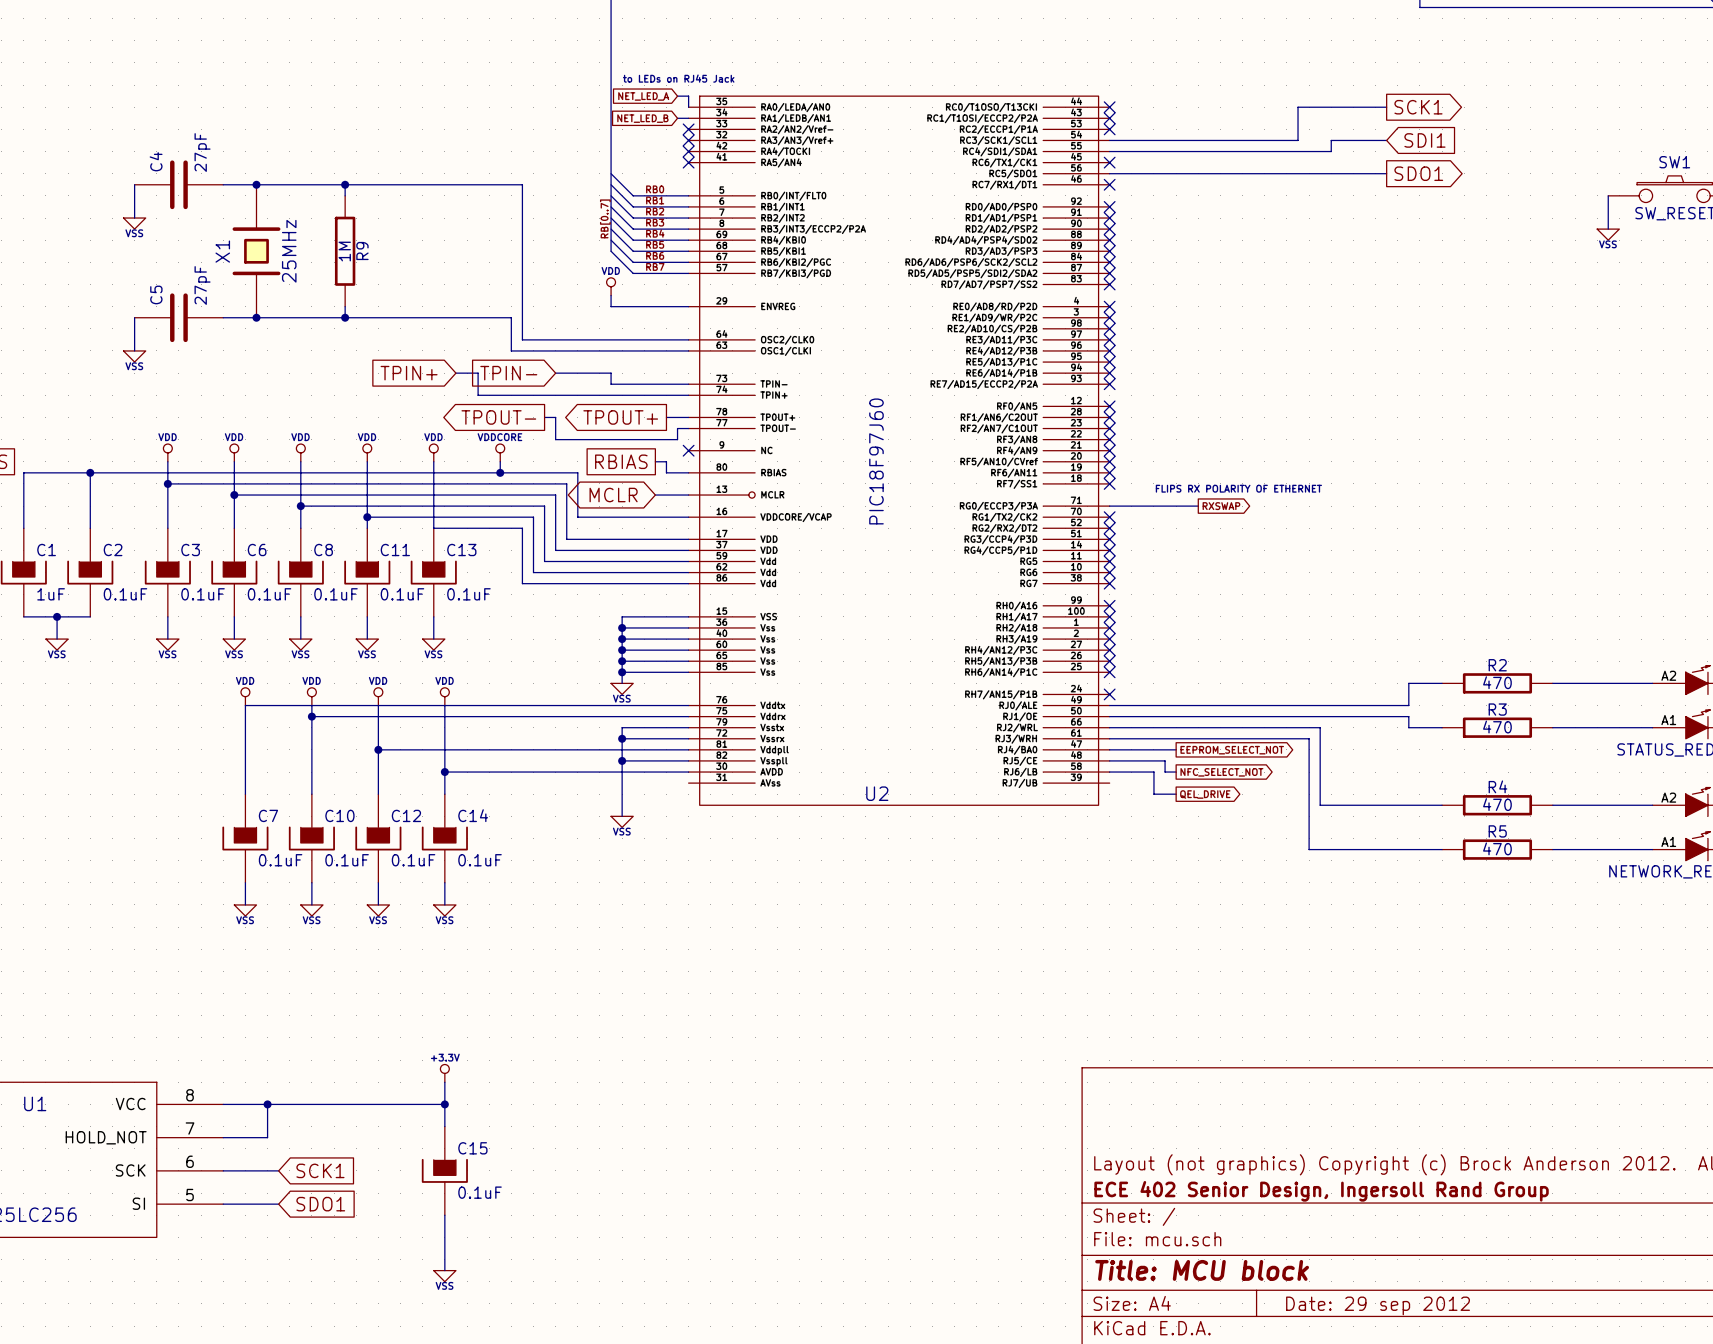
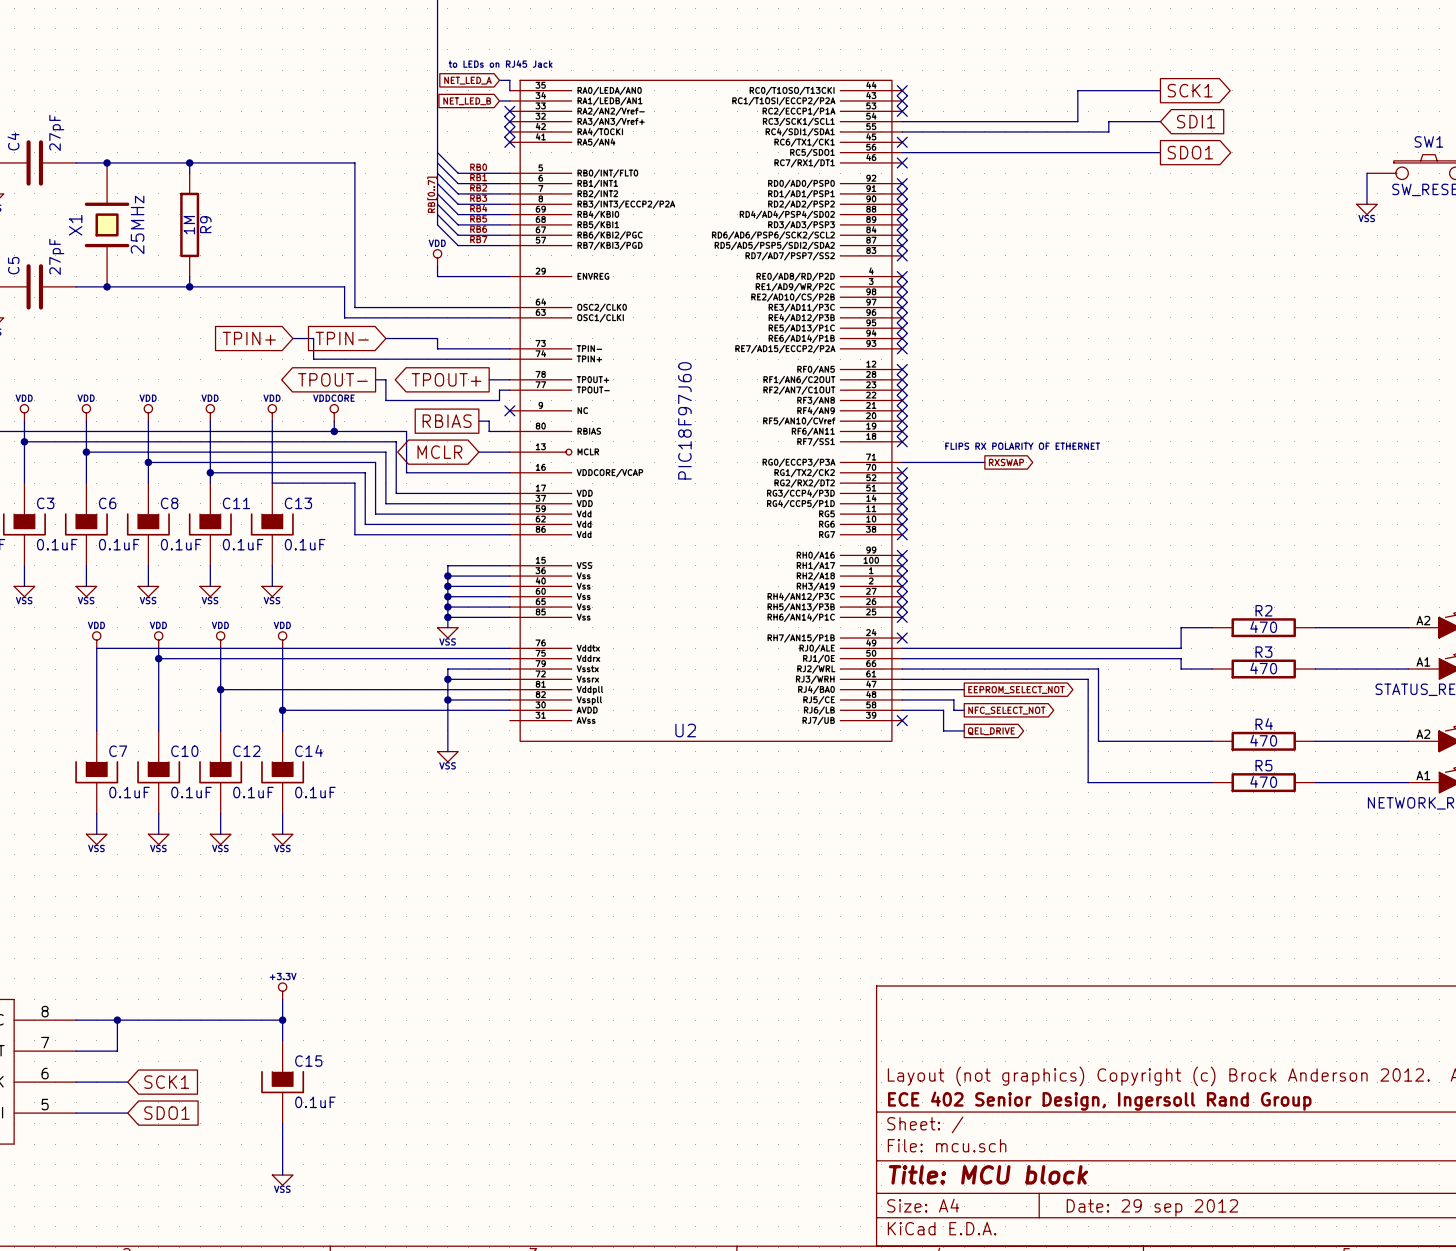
no-connect mark: none -> (902, 720)

